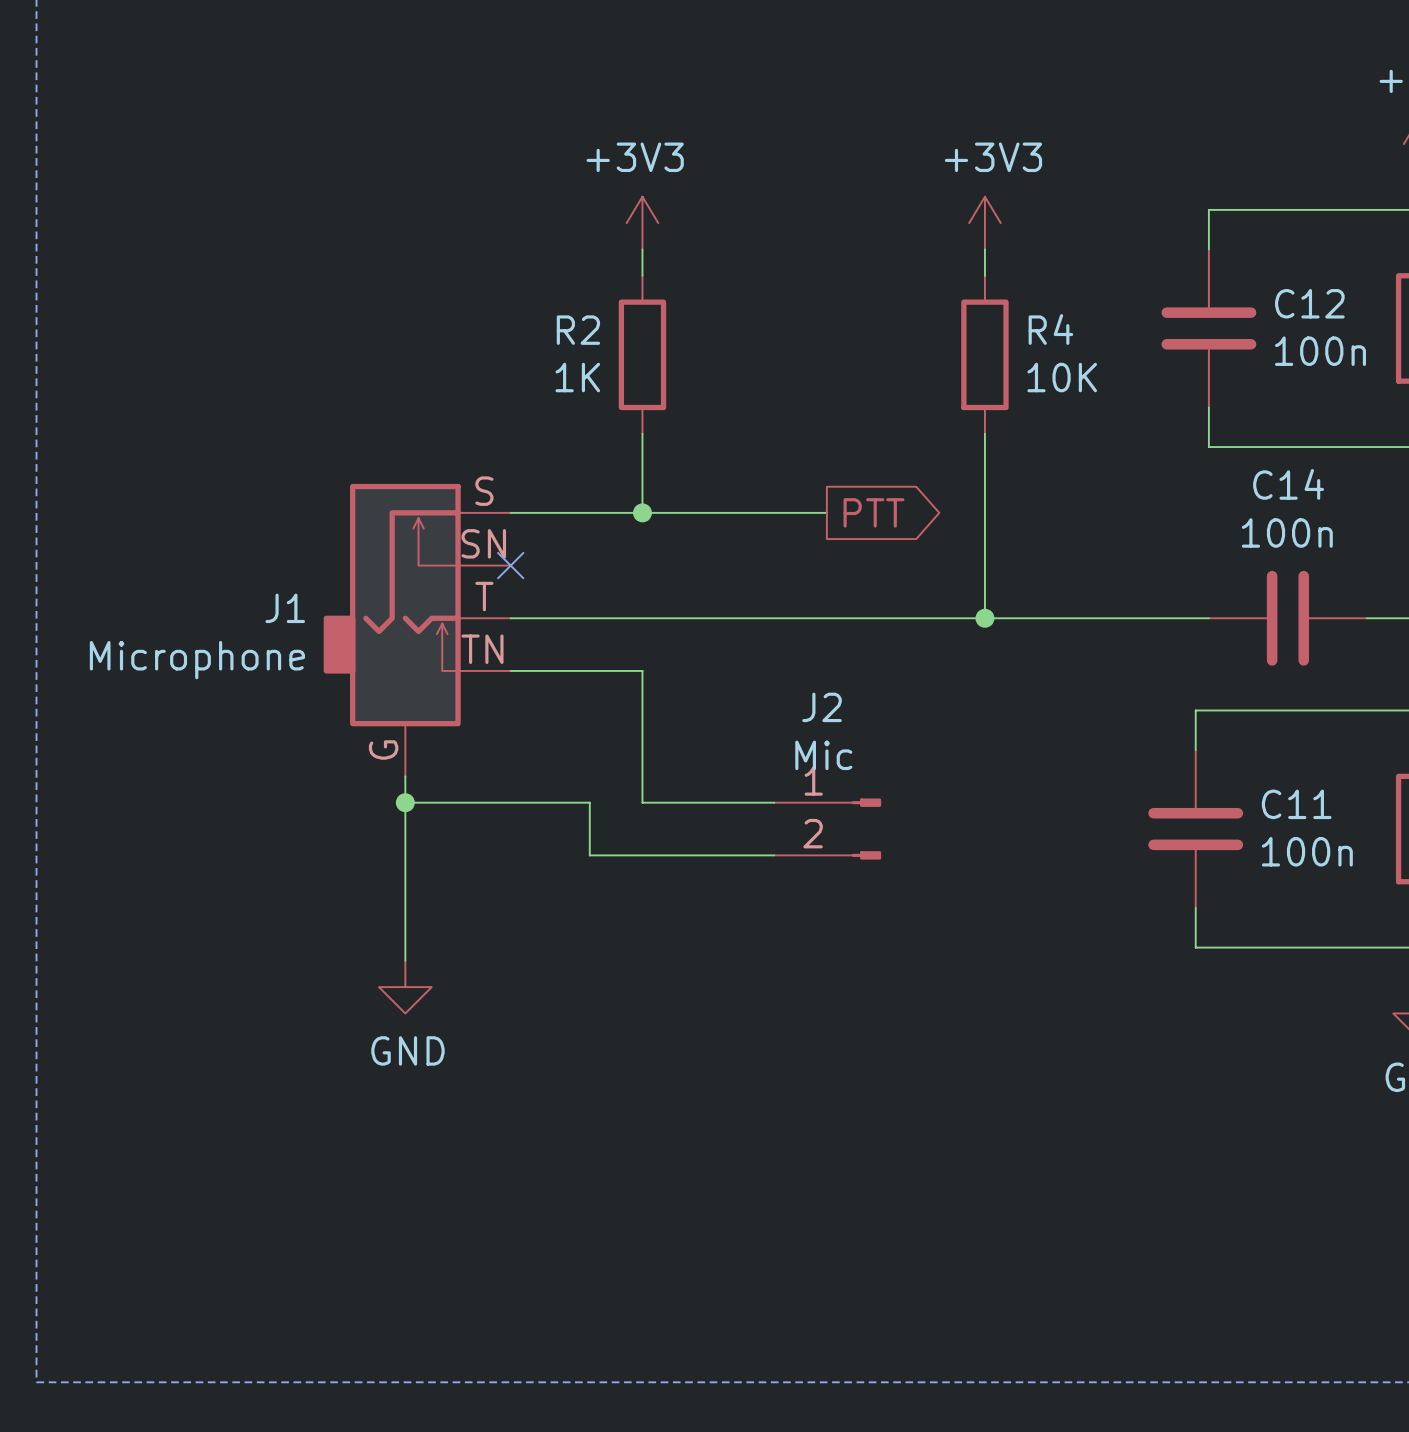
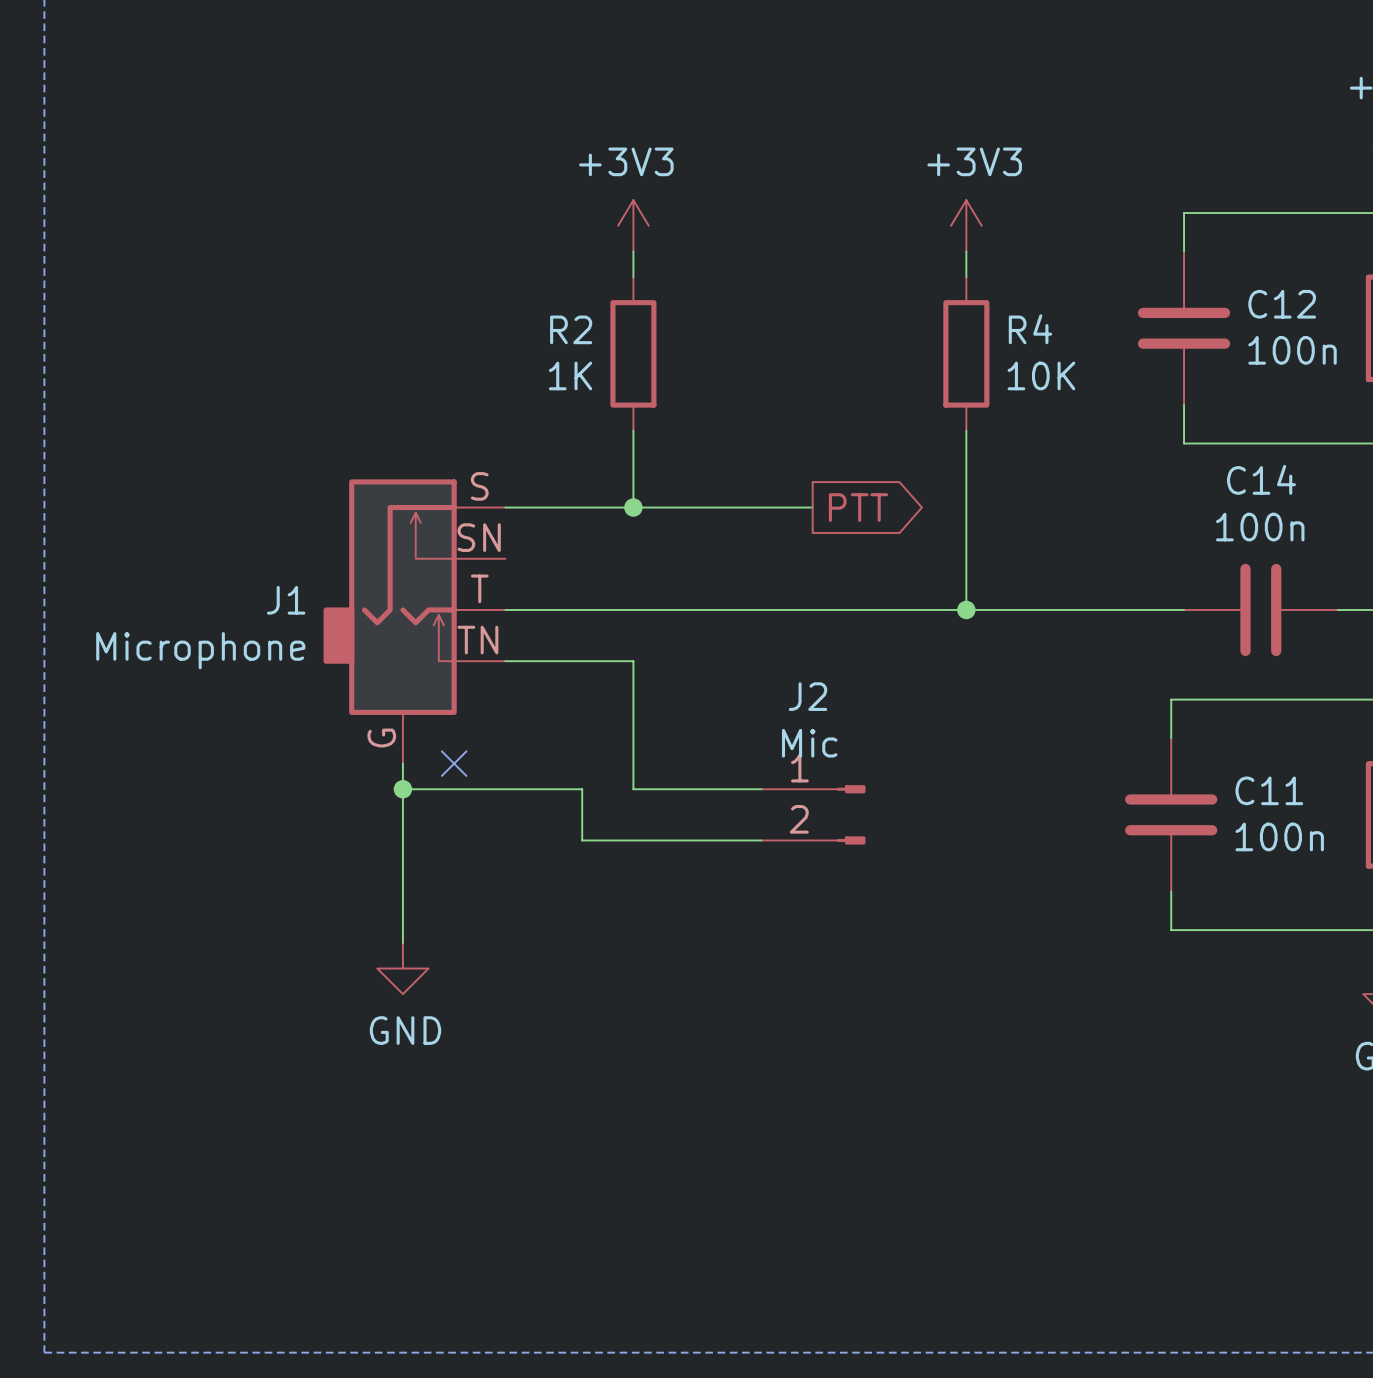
no-connect mark: (510, 565) -> none
no-connect mark: none -> (454, 763)

